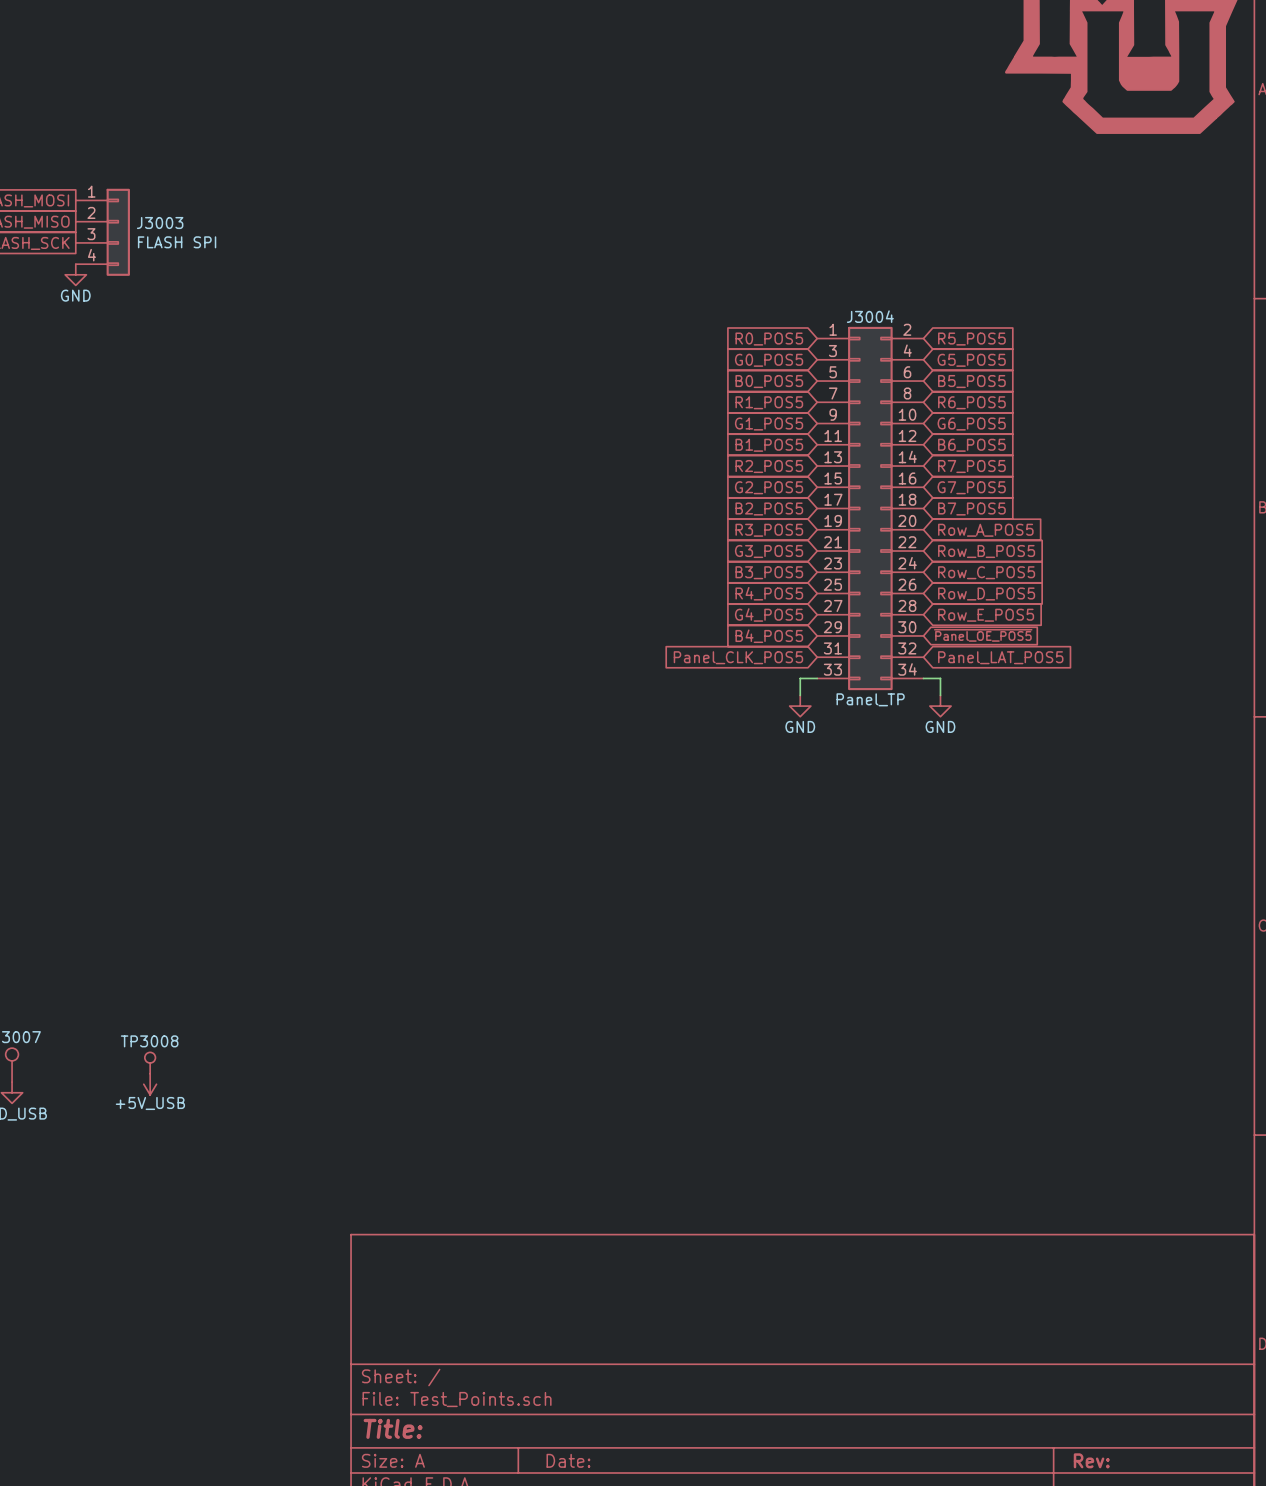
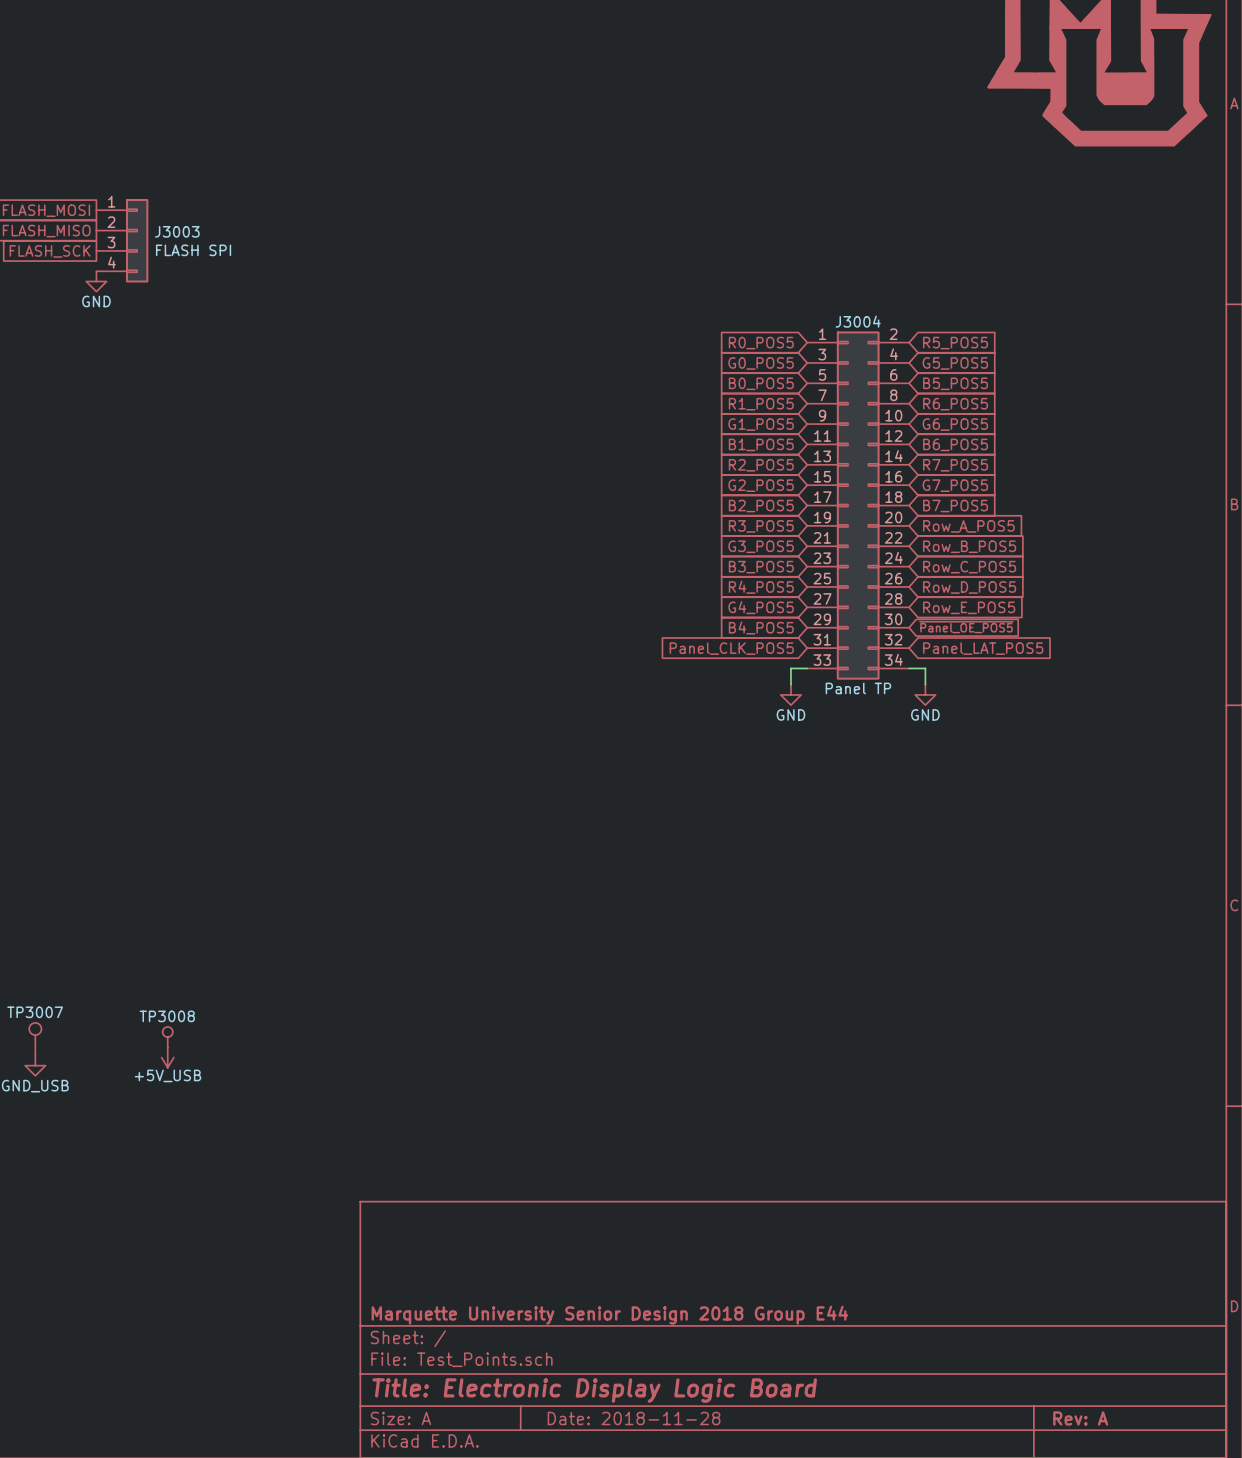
J3004 value: Panel_TP (870, 699) -> Panel TP (858, 688)
title block: none -> Marquette University Senior Design 2018 Group E44 (609, 1315)
title block: Title: (393, 1428) -> Title: Electronic Display Logic Board (594, 1390)
title block: Date: (568, 1460) -> Date: 2018-11-28 (634, 1418)
title block: Rev: (1091, 1460) -> Rev: A (1080, 1418)

